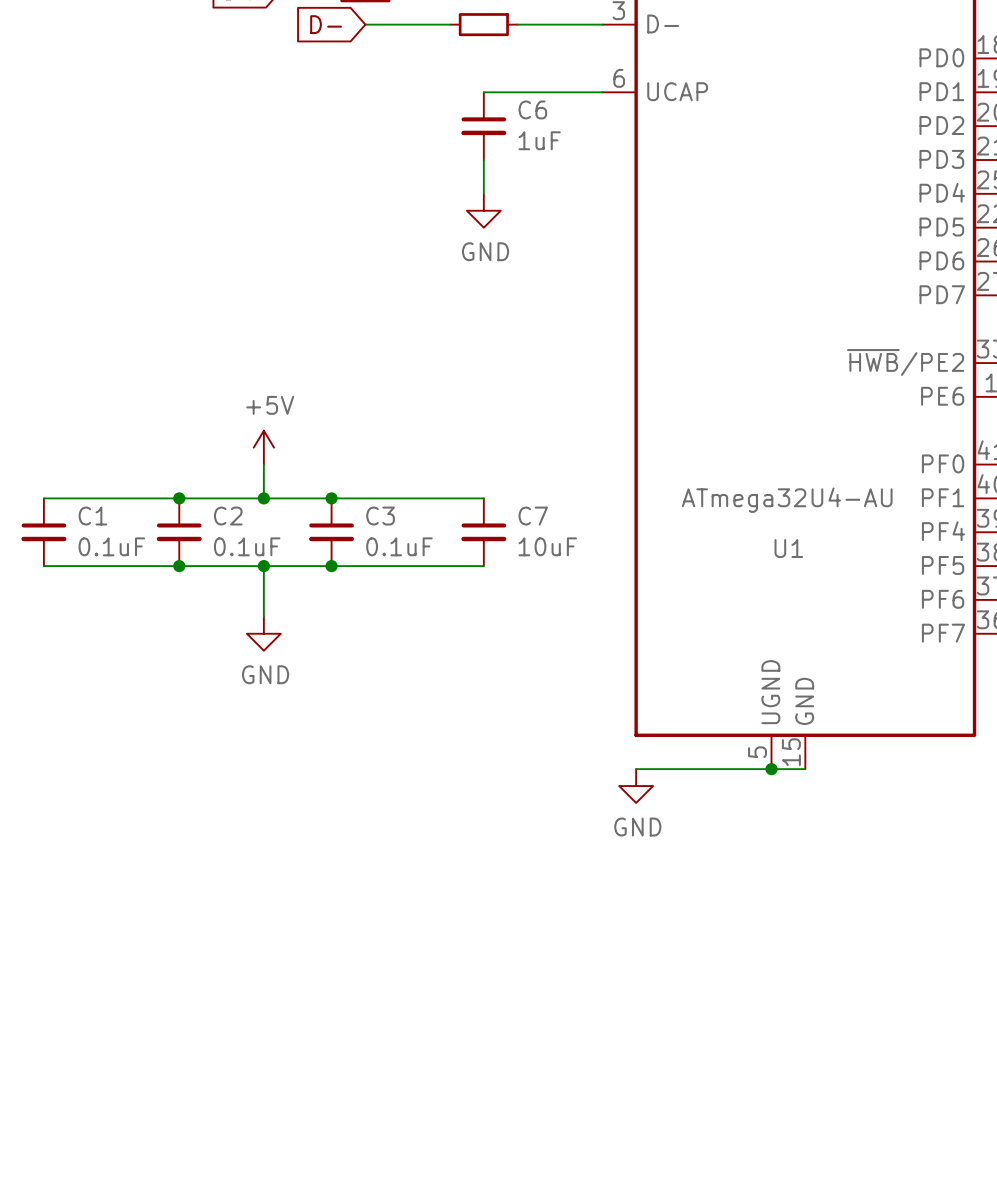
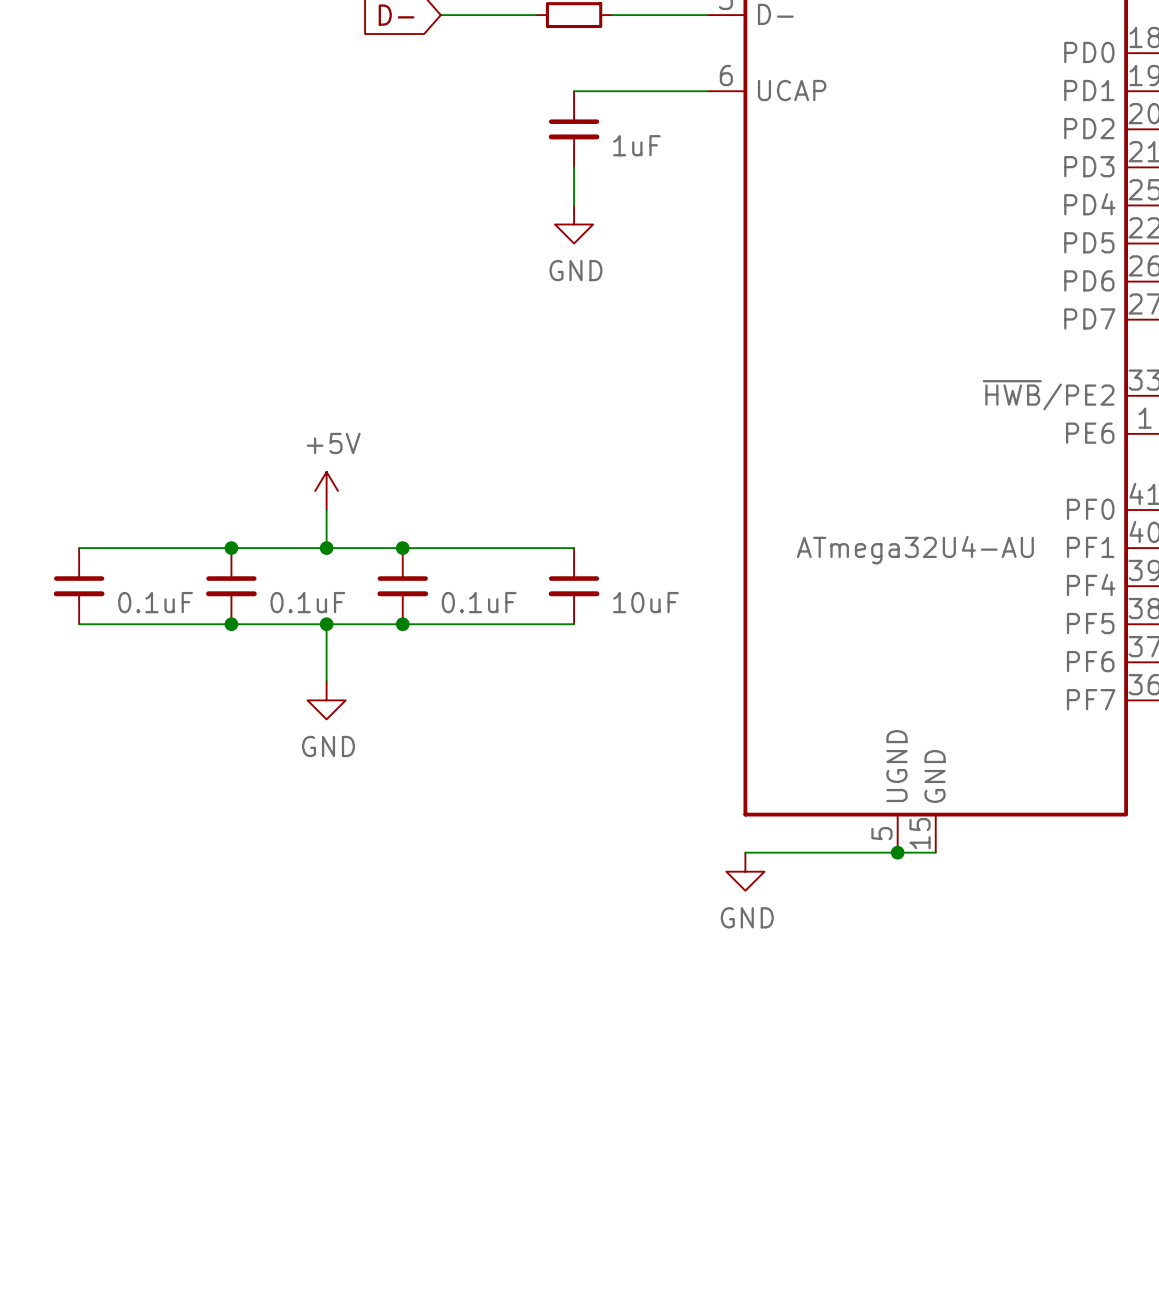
C6 name: C6 (532, 109) -> none
C1 name: C1 (92, 516) -> none
C2 name: C2 (228, 516) -> none
C3 name: C3 (380, 516) -> none
C7 name: C7 (533, 516) -> none
U1 name: U1 (788, 548) -> none

